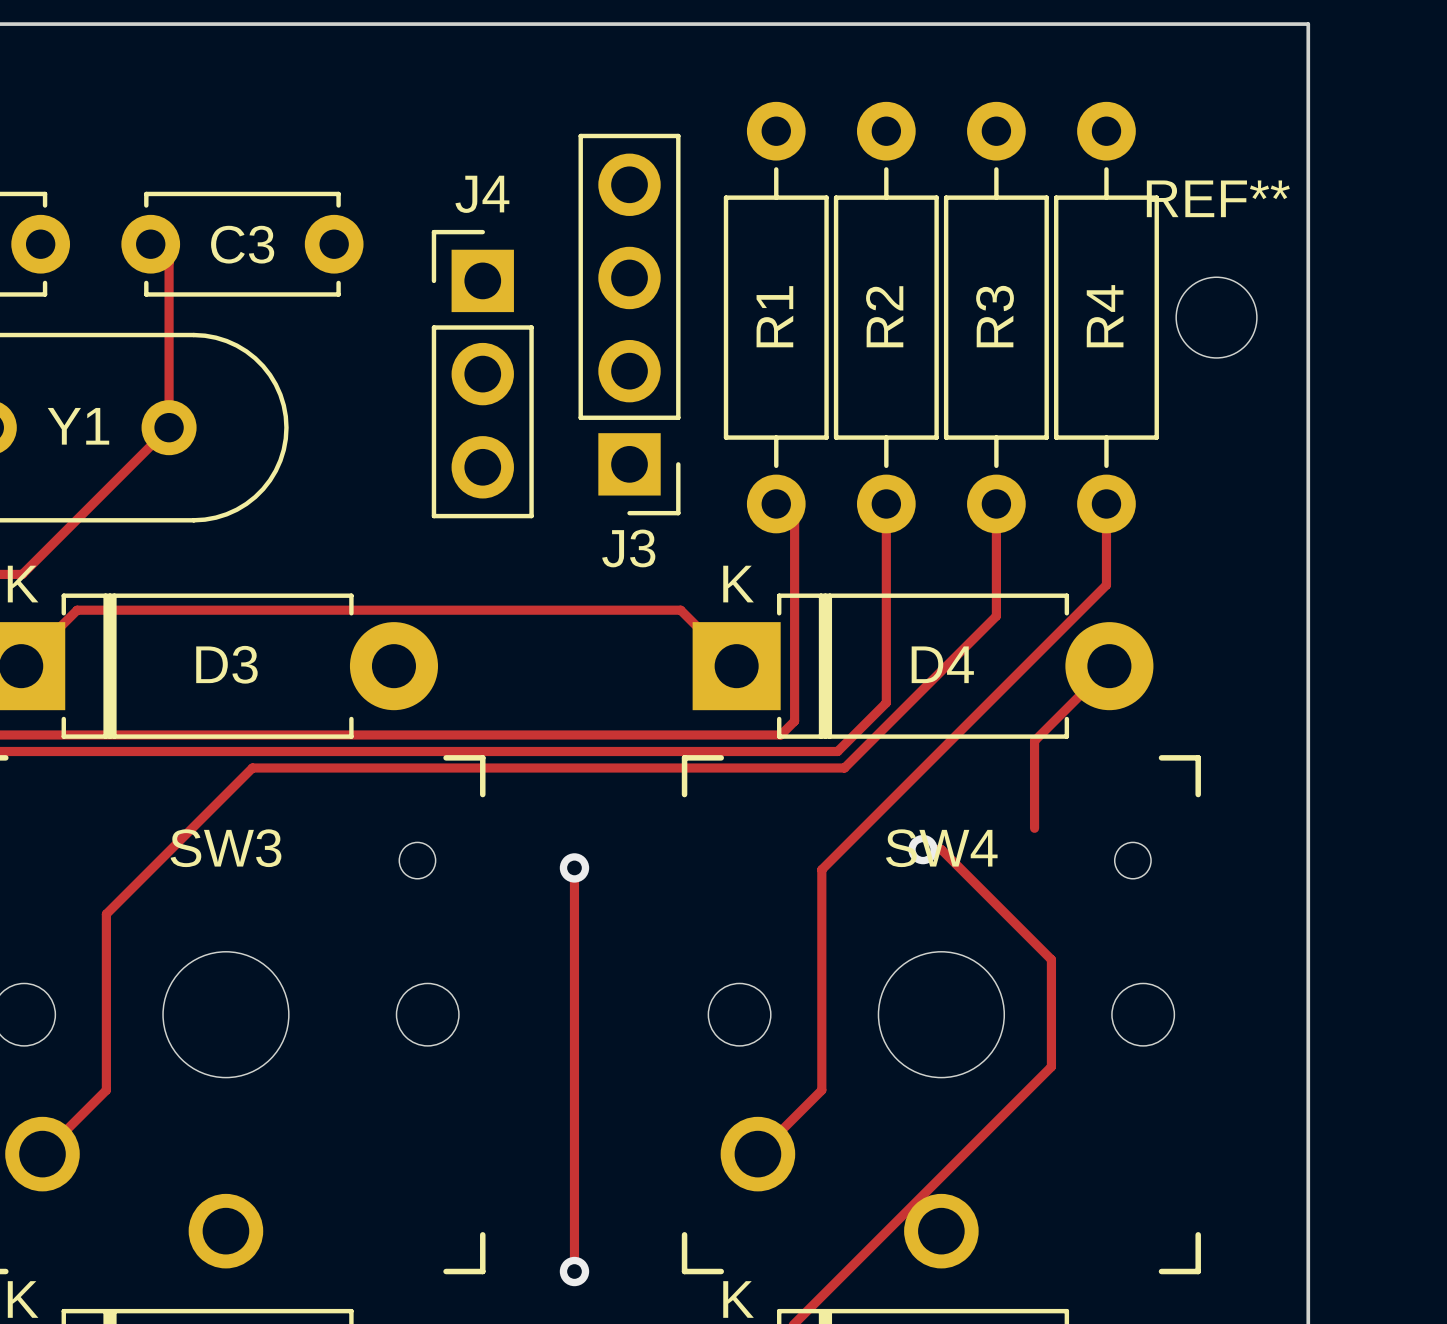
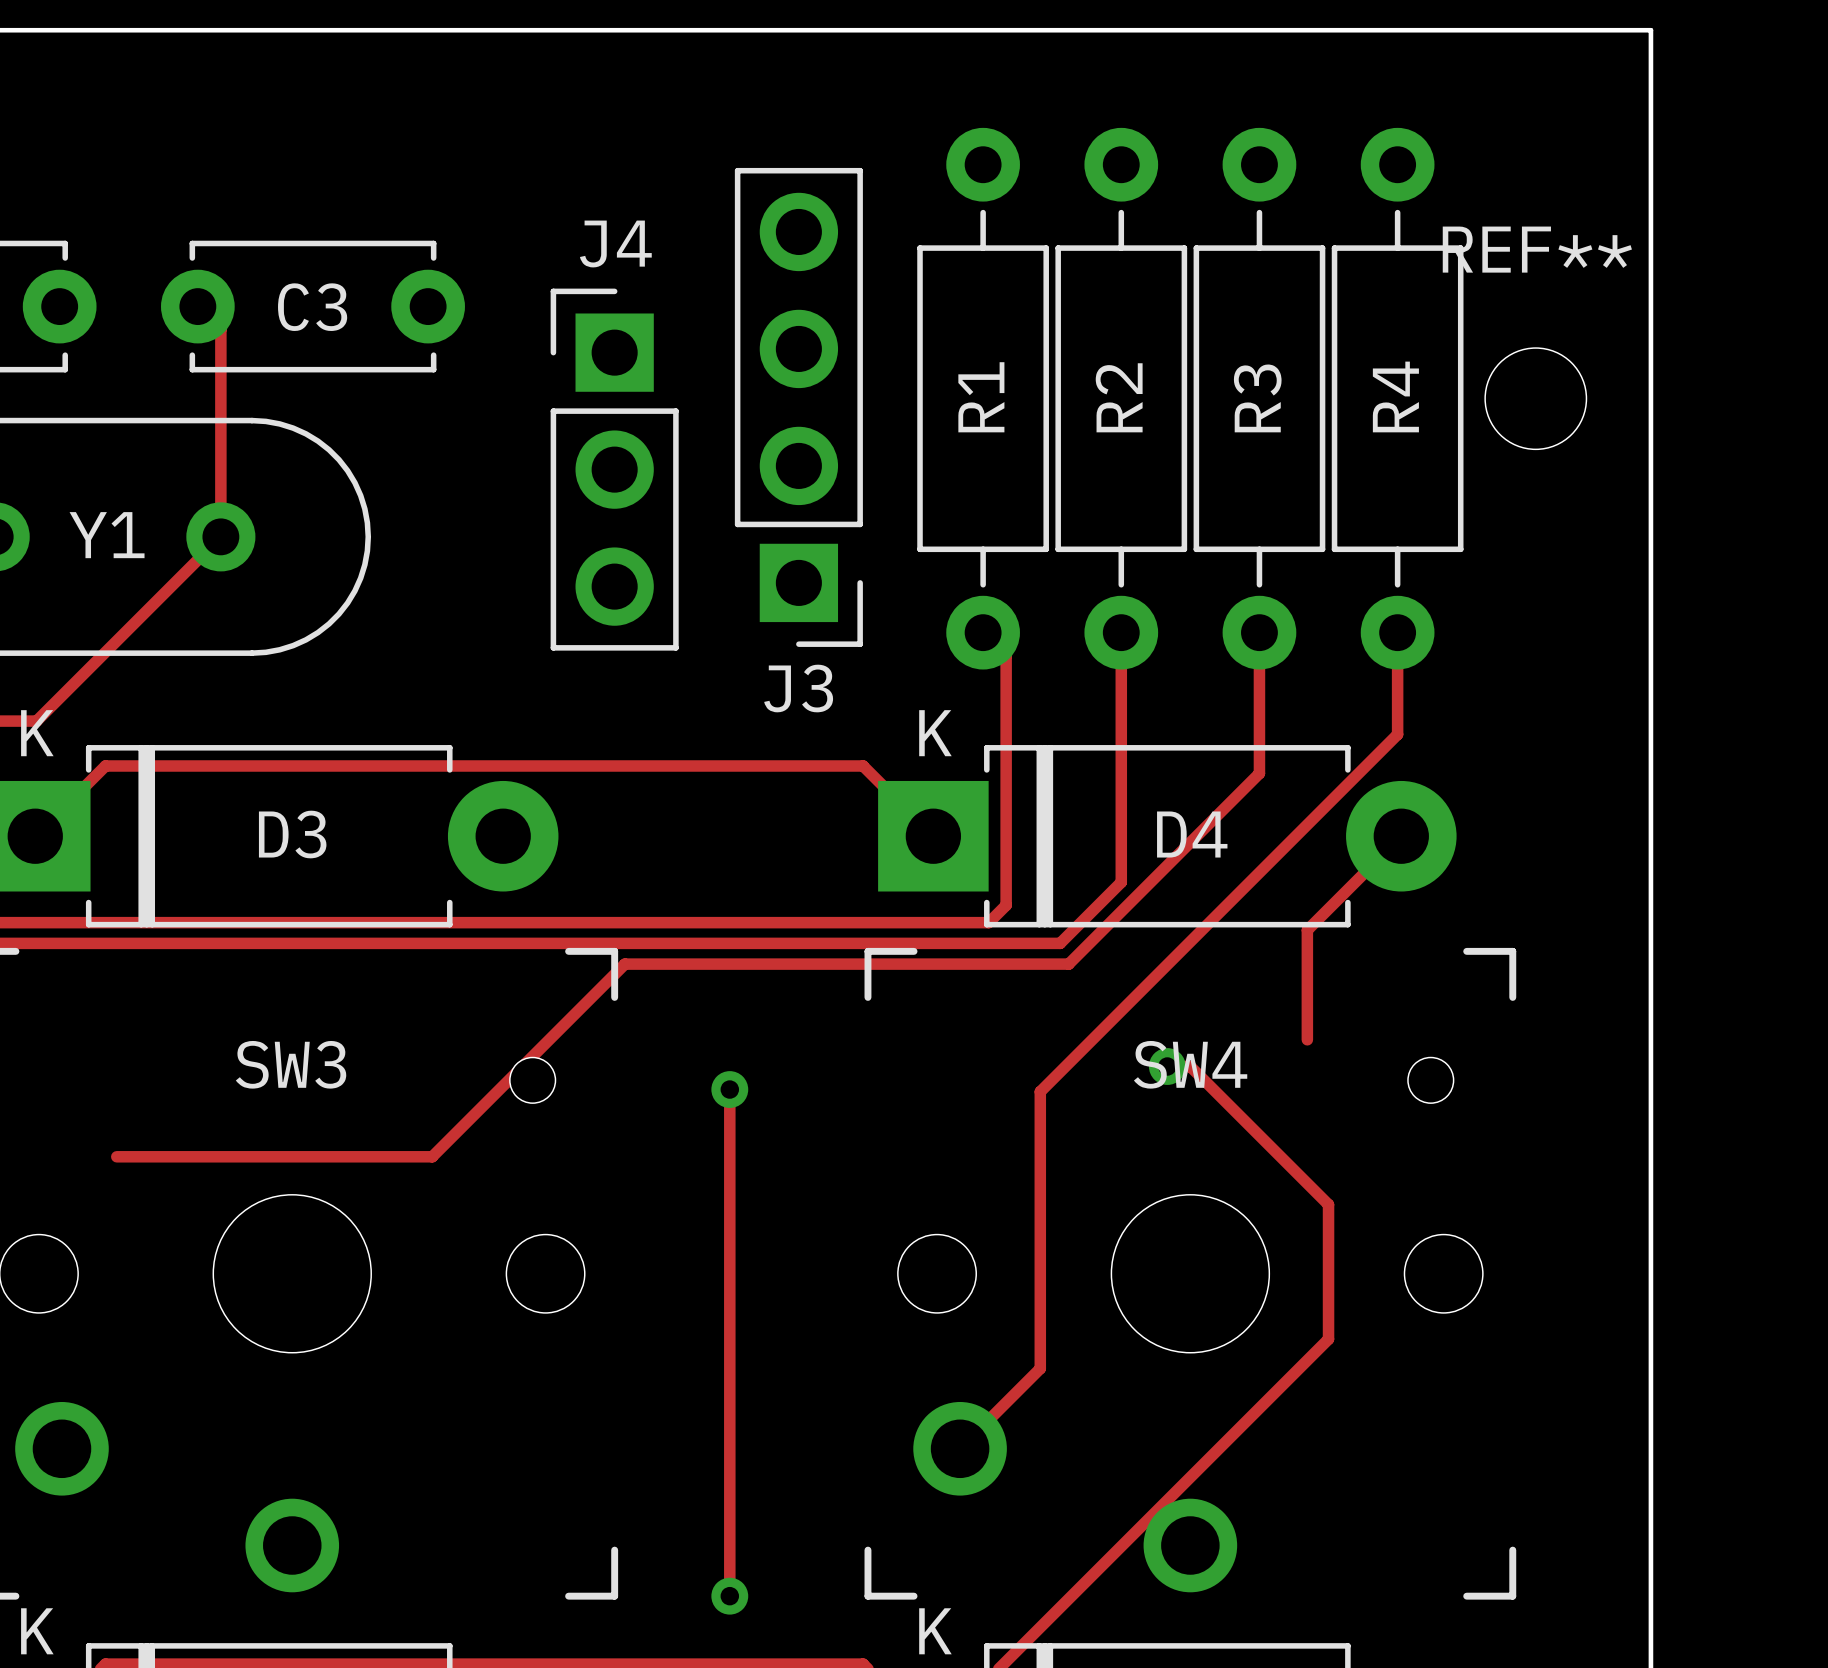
track: (490, 768) (252, 768) (106, 914) (106, 1090) (42, 1154) -> (624, 964) (432, 1156) (116, 1156)

